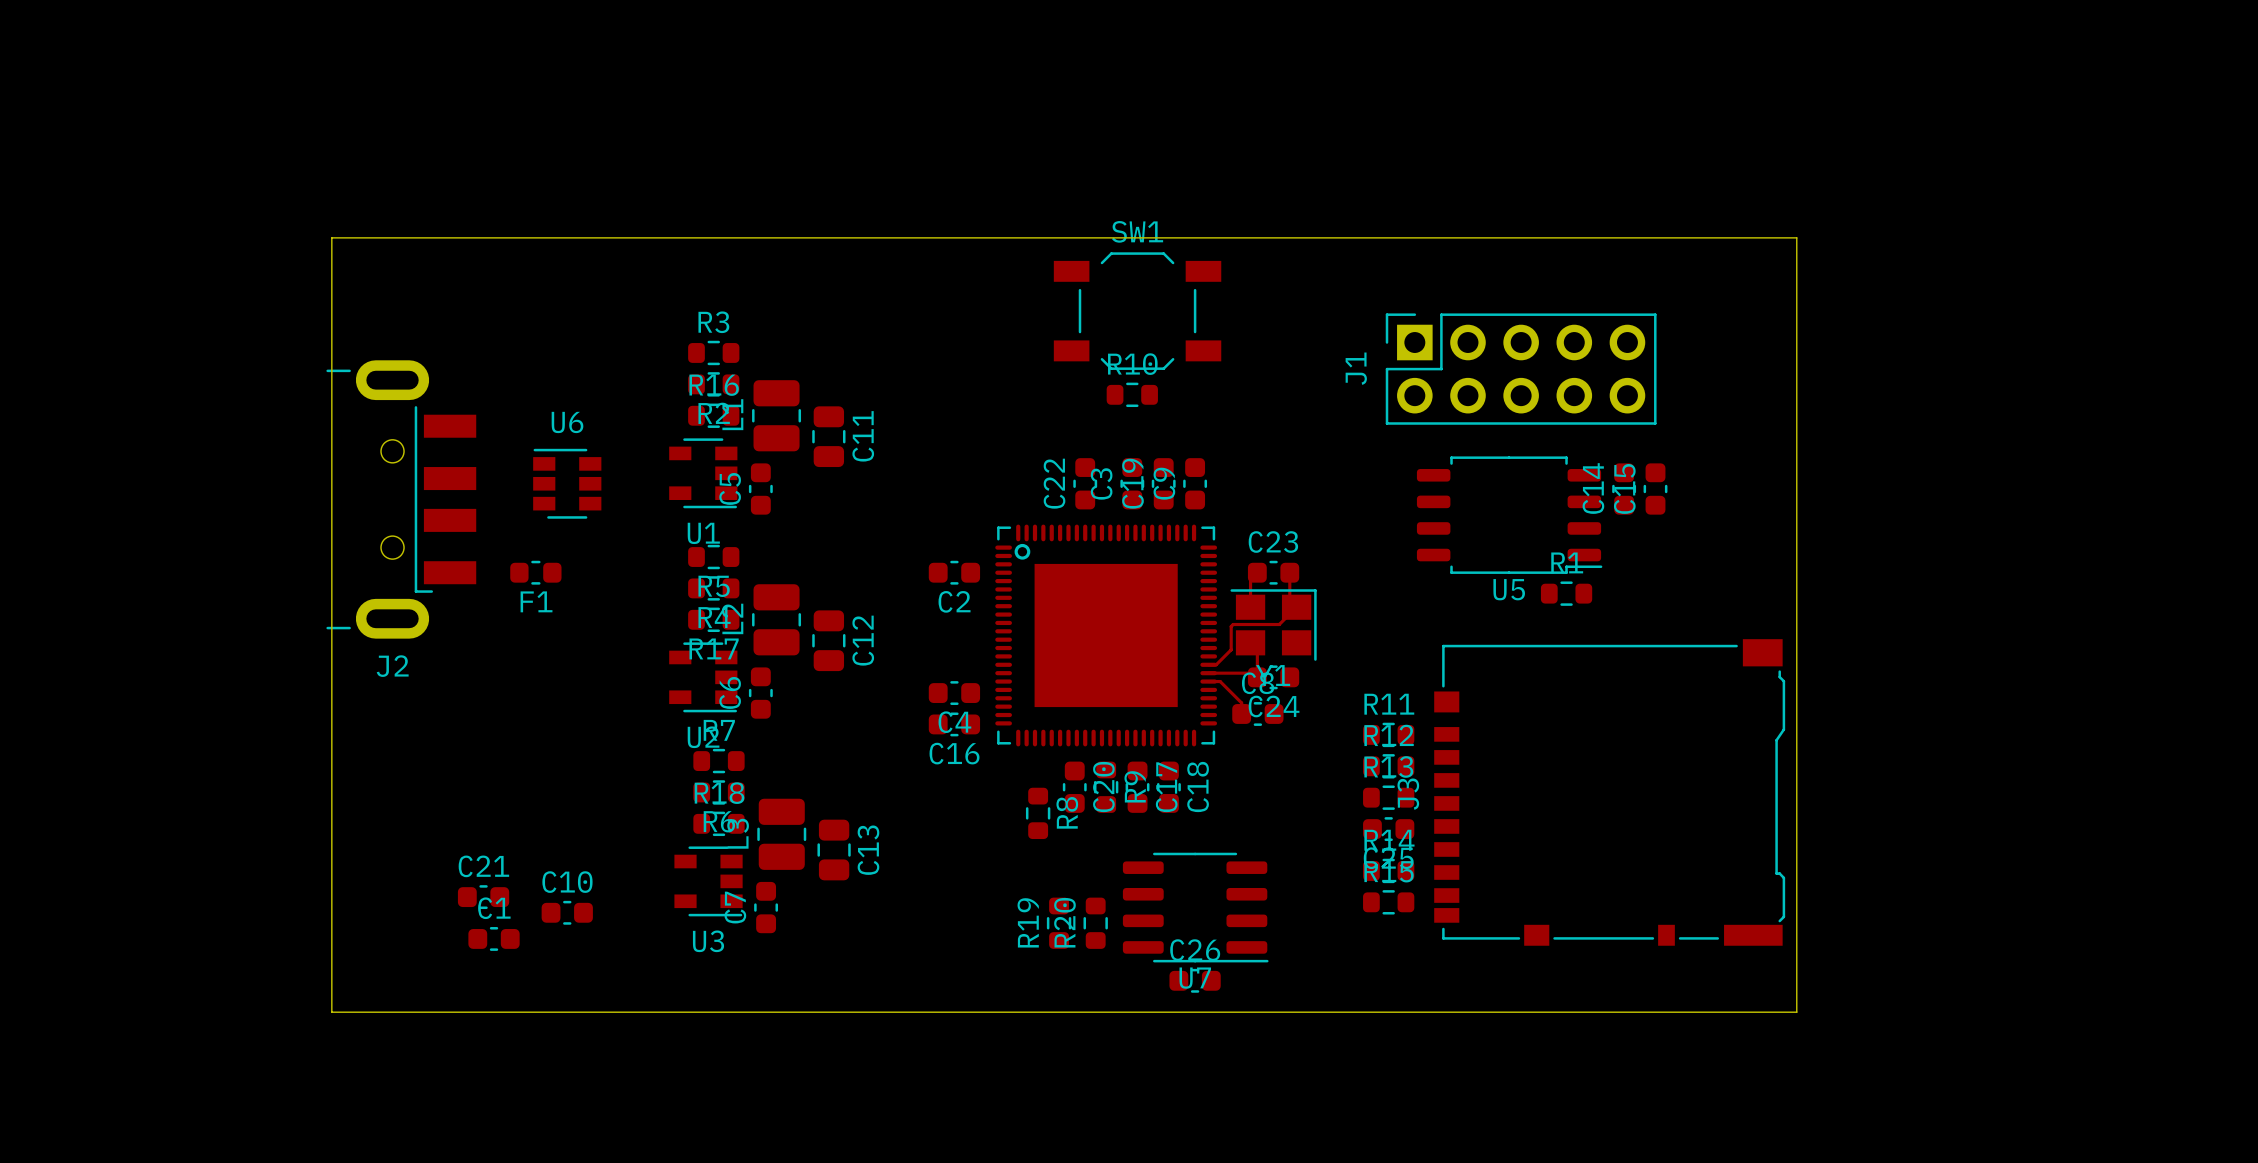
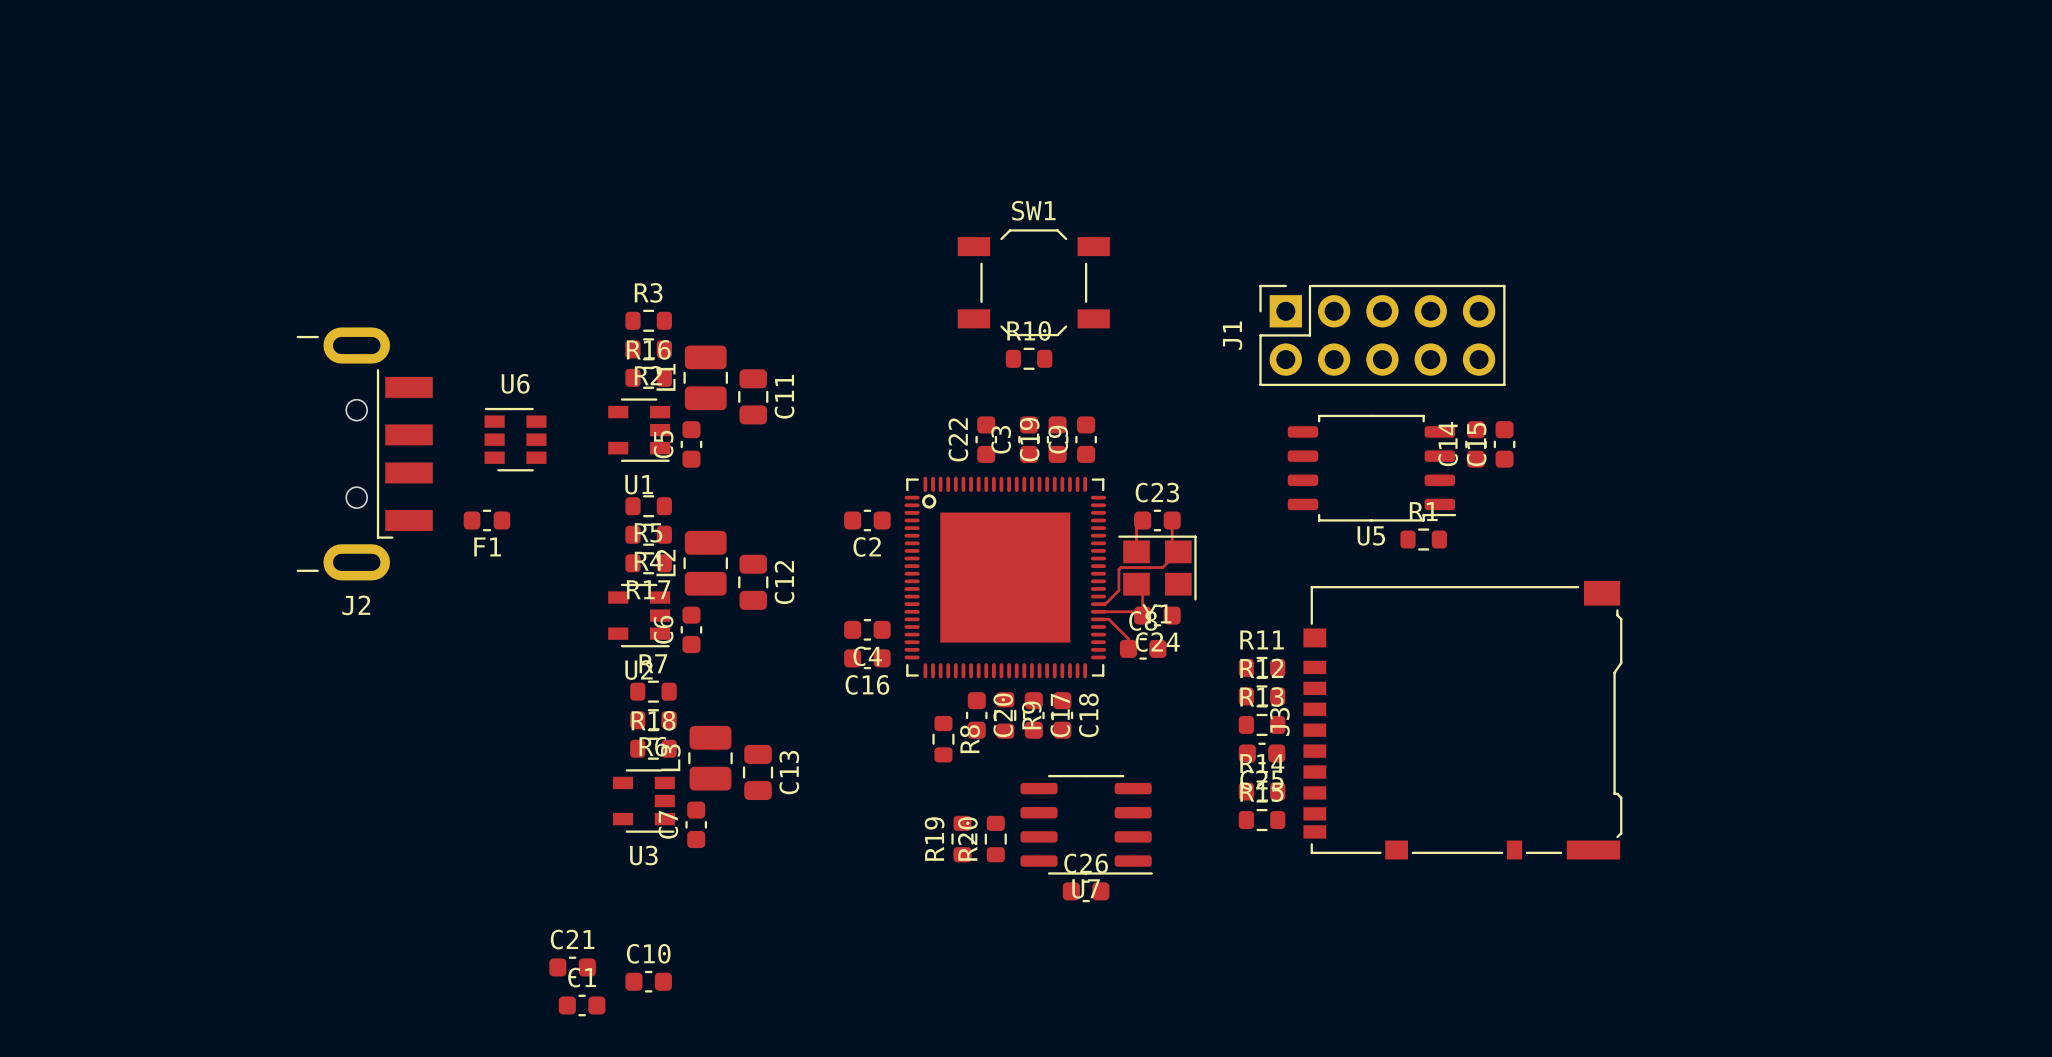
board edge: (331, 237) (1796, 237) (1796, 1012) (331, 1012) (331, 237) -> none
C21 position: (483, 897) -> (572, 967)
C10 position: (567, 912) -> (648, 981)
C1 position: (494, 938) -> (582, 1005)

